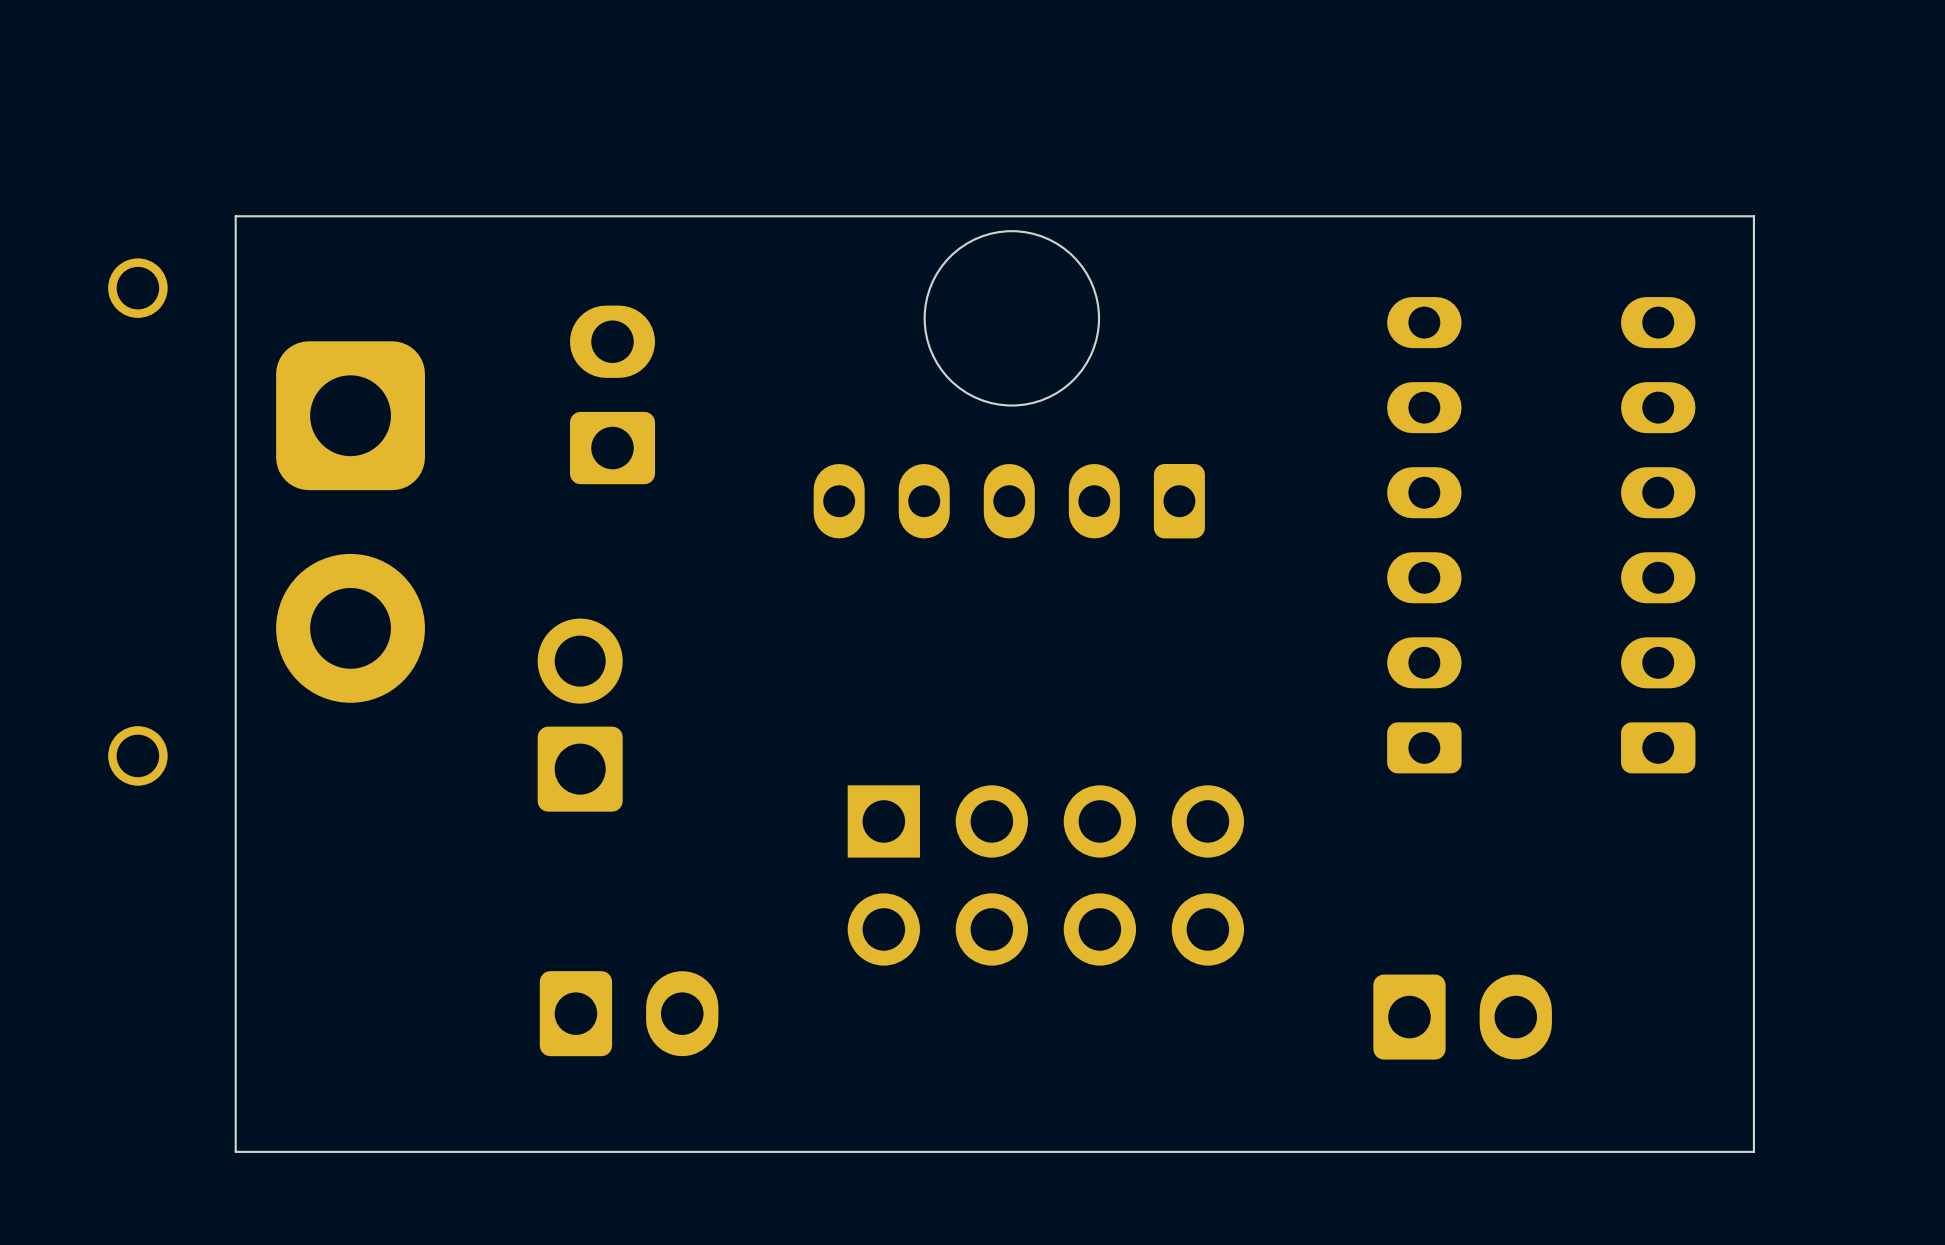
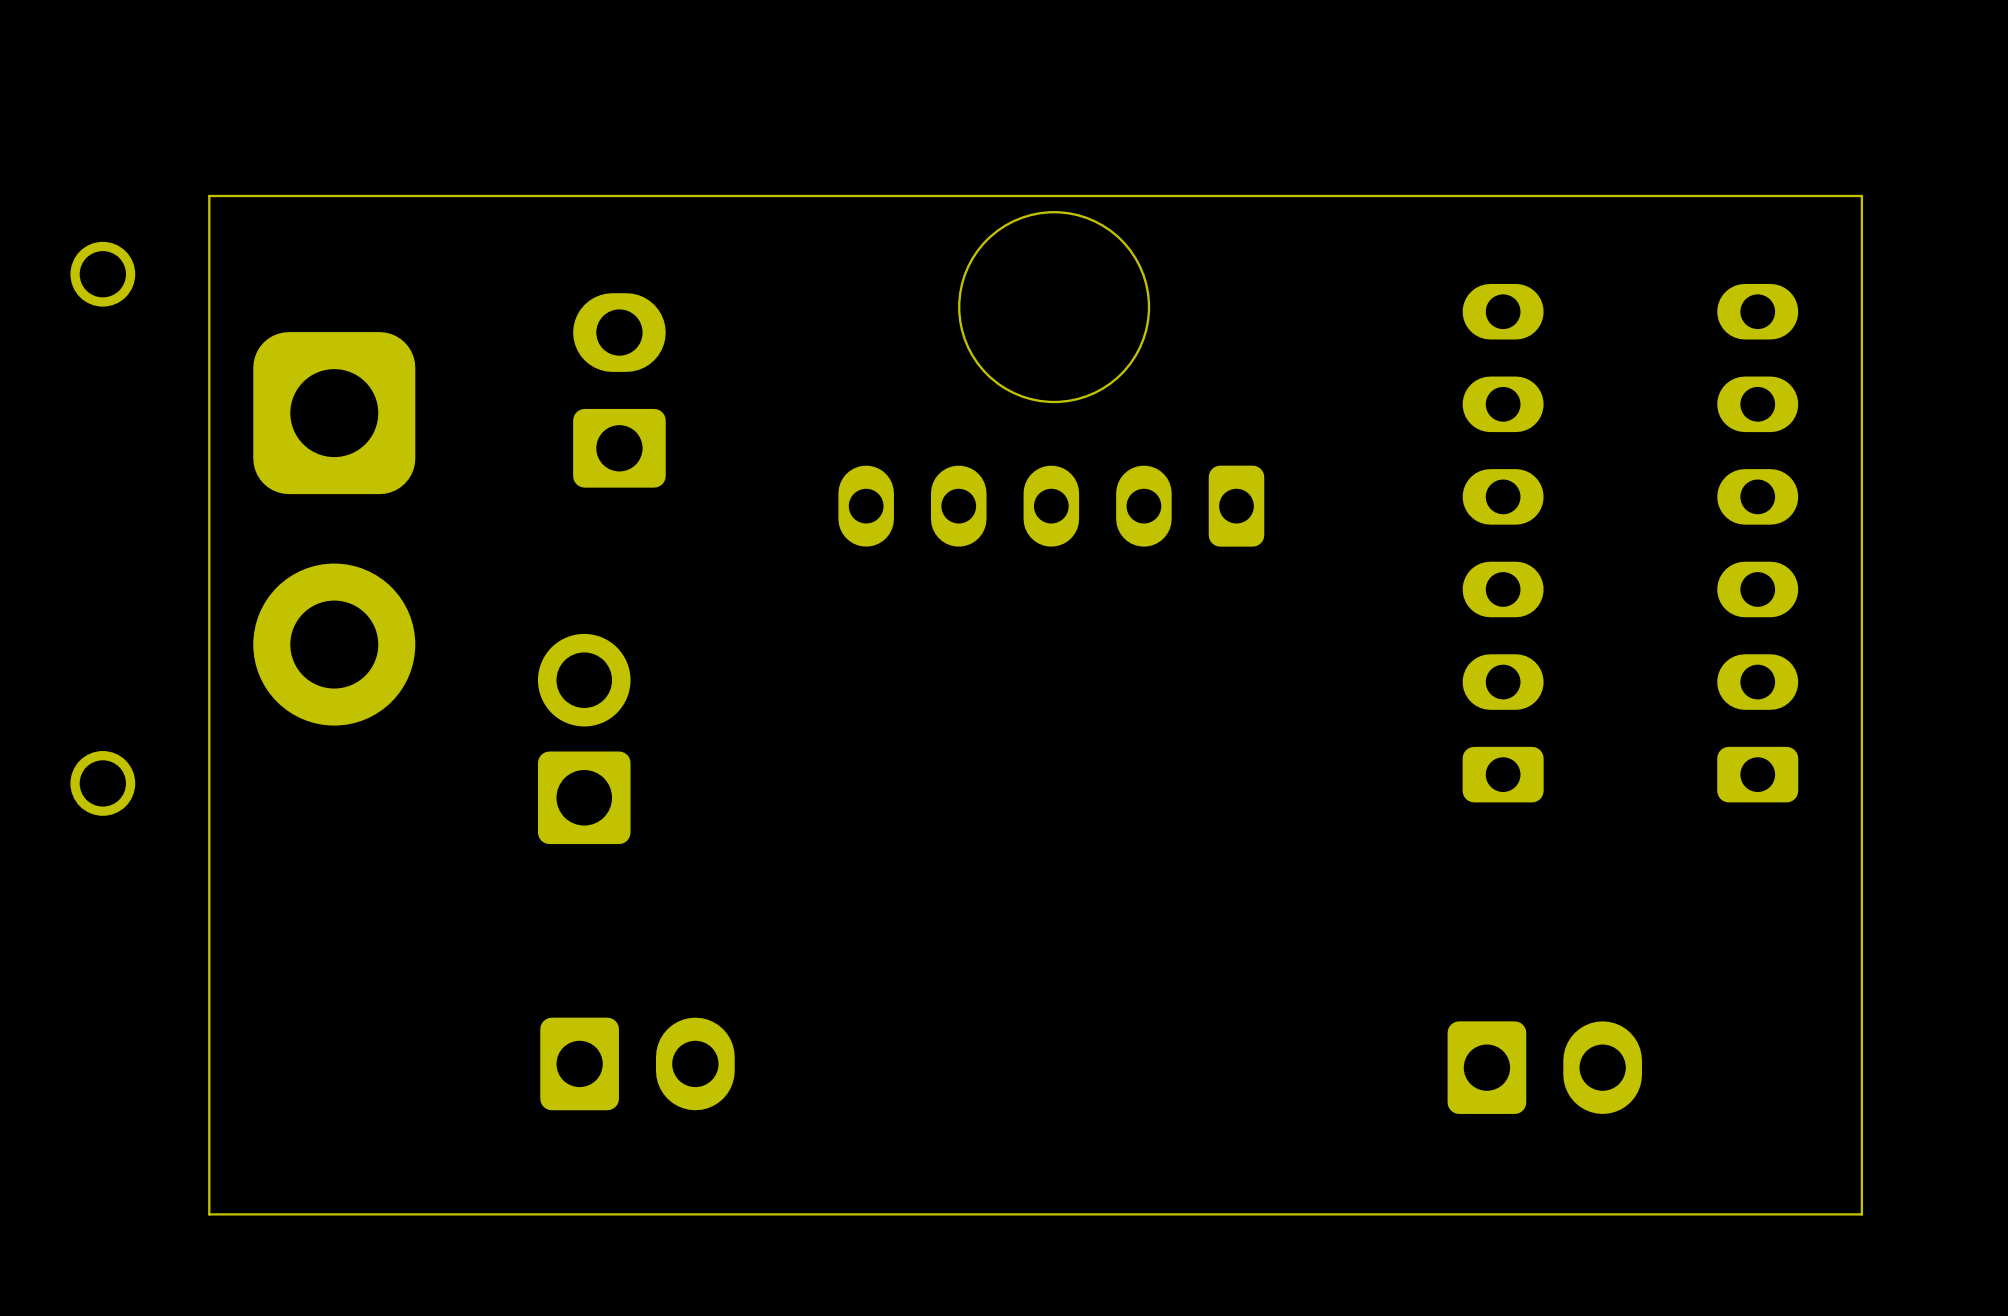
part: (1045, 875) -> none

